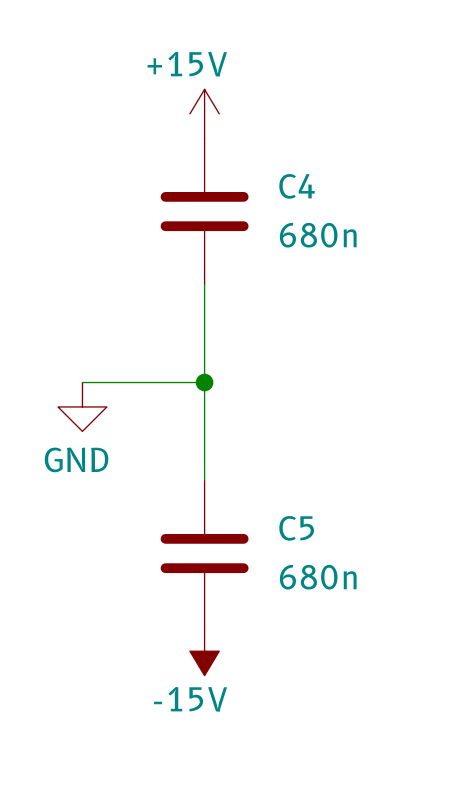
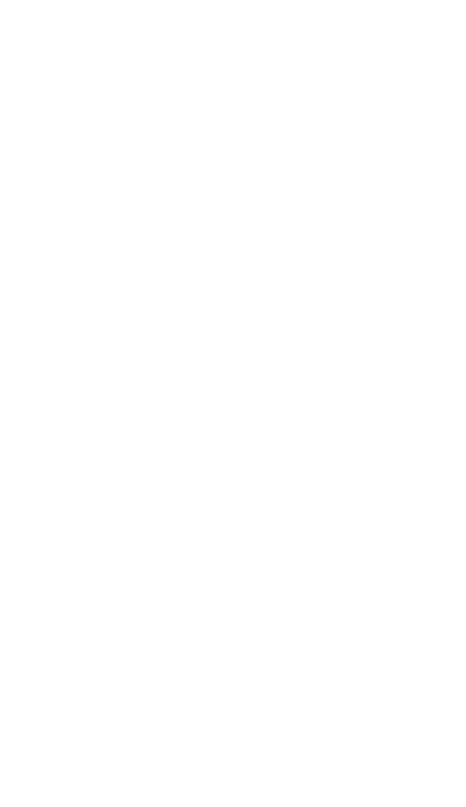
power symbol: +15V (204, 113) -> none
C4: 680n (204, 211) -> none
wire: (204, 284) (204, 480) -> none
wire: (82, 382) (204, 382) -> none
junction: (204, 382) -> none
power symbol: GND (82, 406) -> none
C5: 680n (204, 553) -> none
power symbol: -15V (204, 651) -> none

